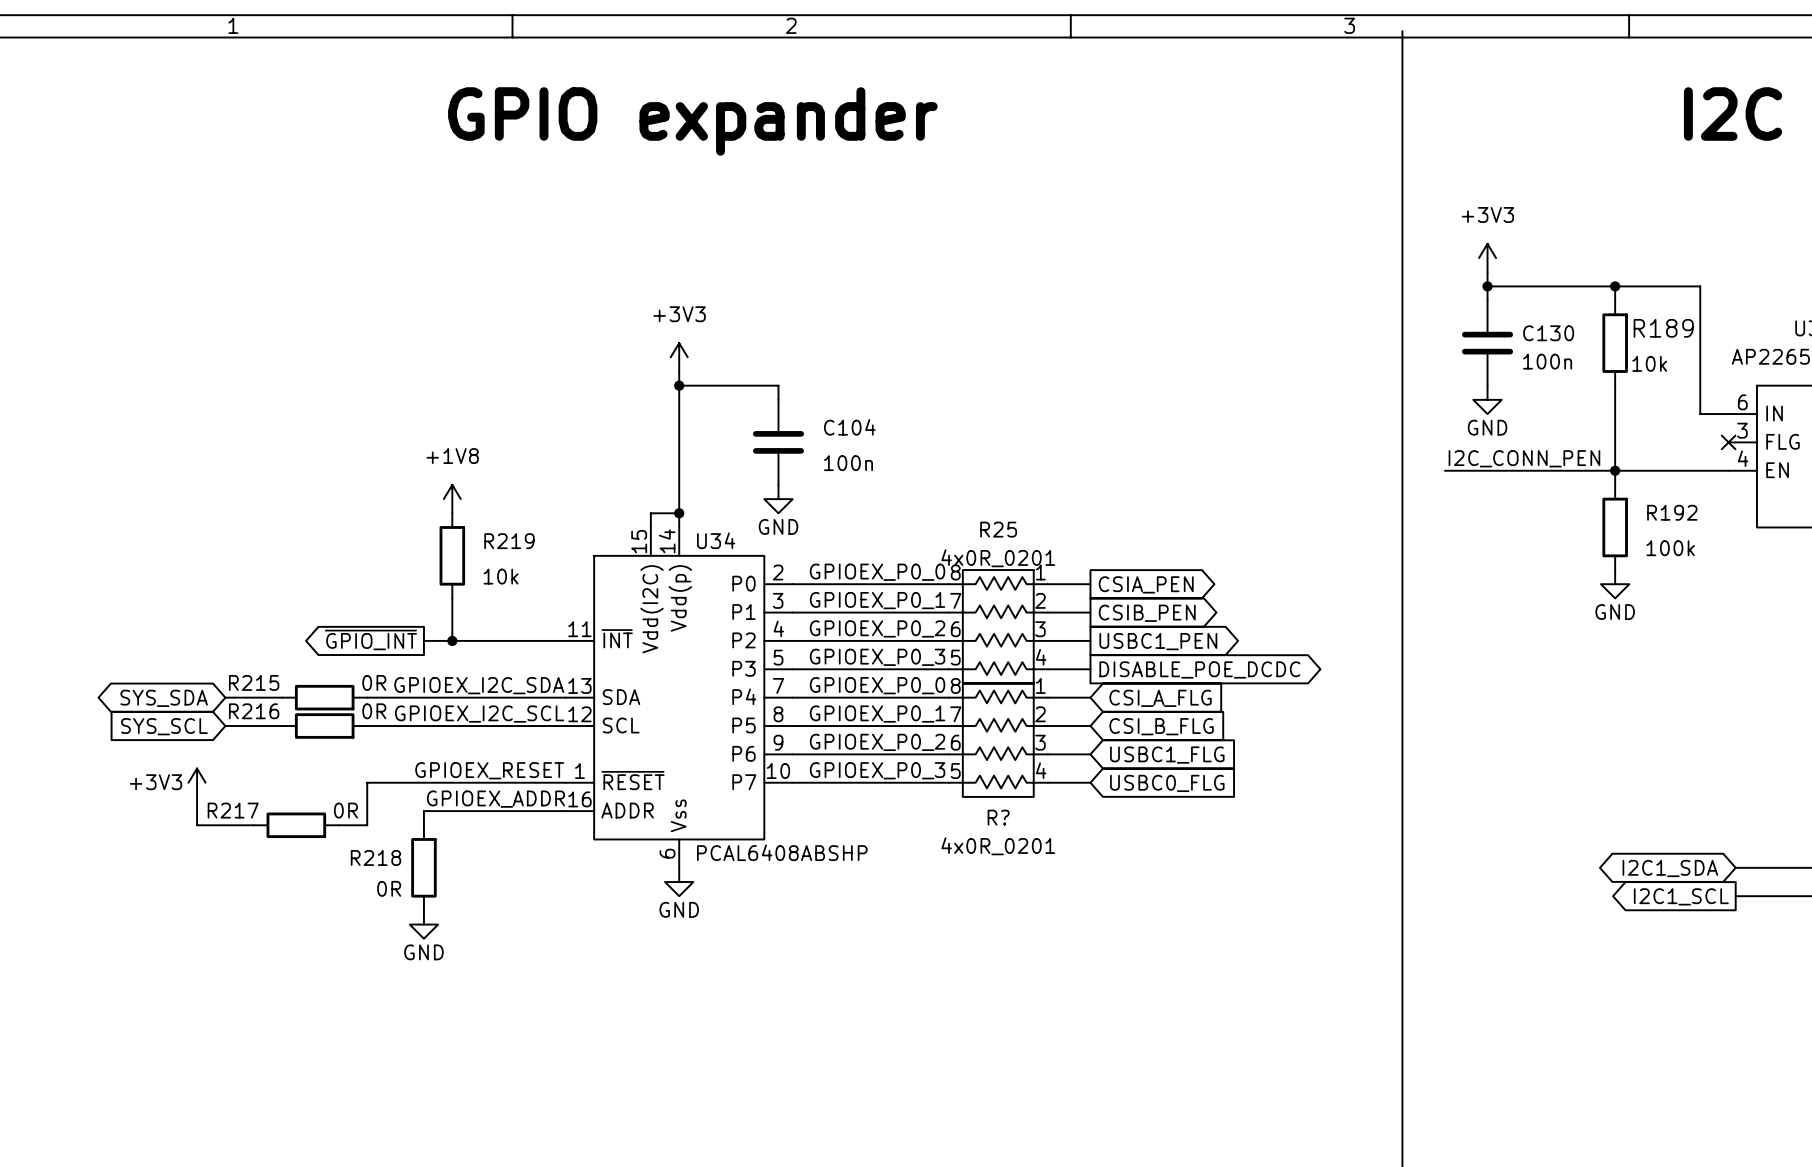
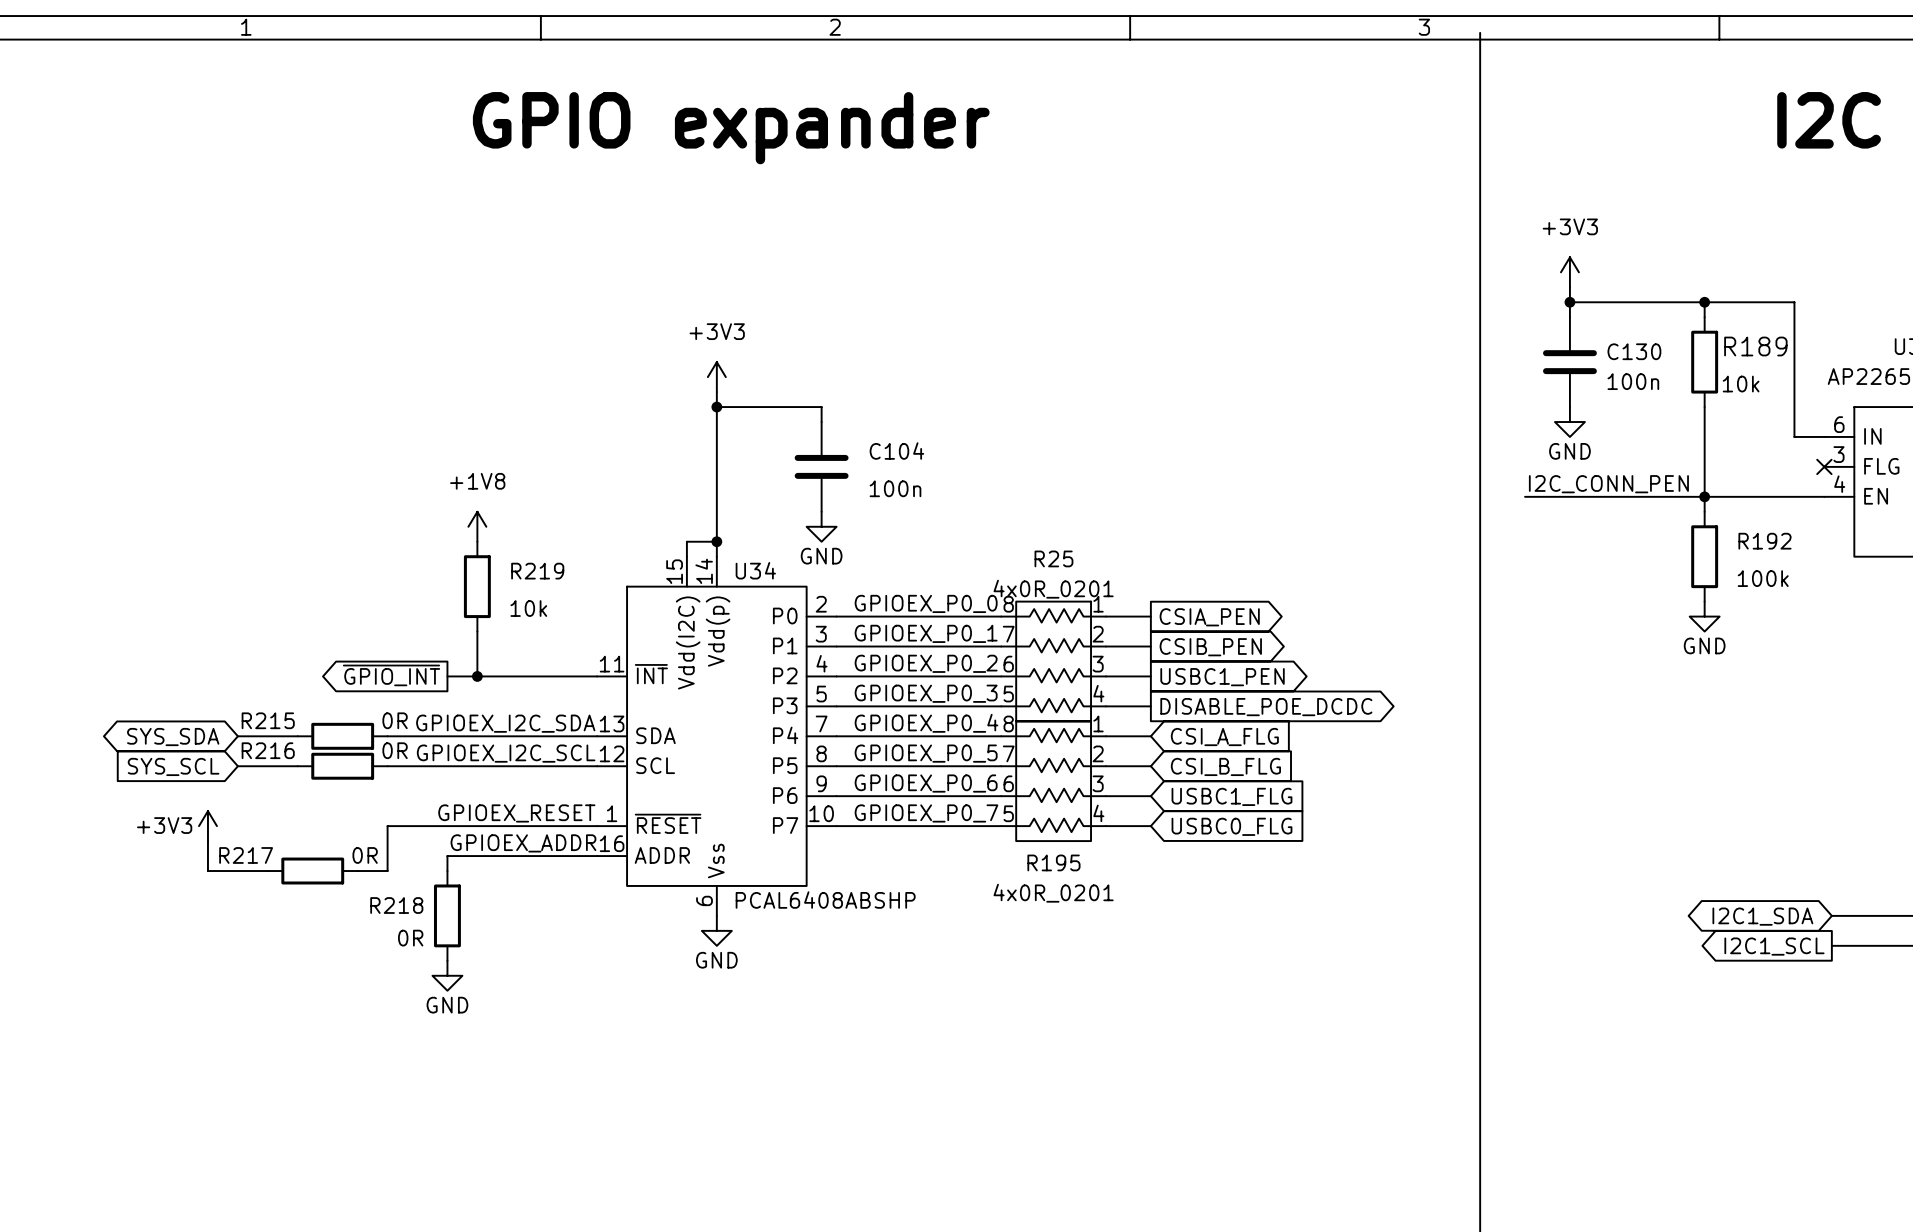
label: GPIOEX_P0_0 (877, 685) -> GPIOEX_P0_4 (926, 723)
label: GPIOEX_P0_1 (877, 714) -> GPIOEX_P0_5 (926, 753)
label: GPIOEX_P0_2 (877, 742) -> GPIOEX_P0_6 (926, 783)
label: GPIOEX_P0_3 (877, 770) -> GPIOEX_P0_7 (926, 813)
R? name: R? (998, 817) -> R195 (1053, 862)

